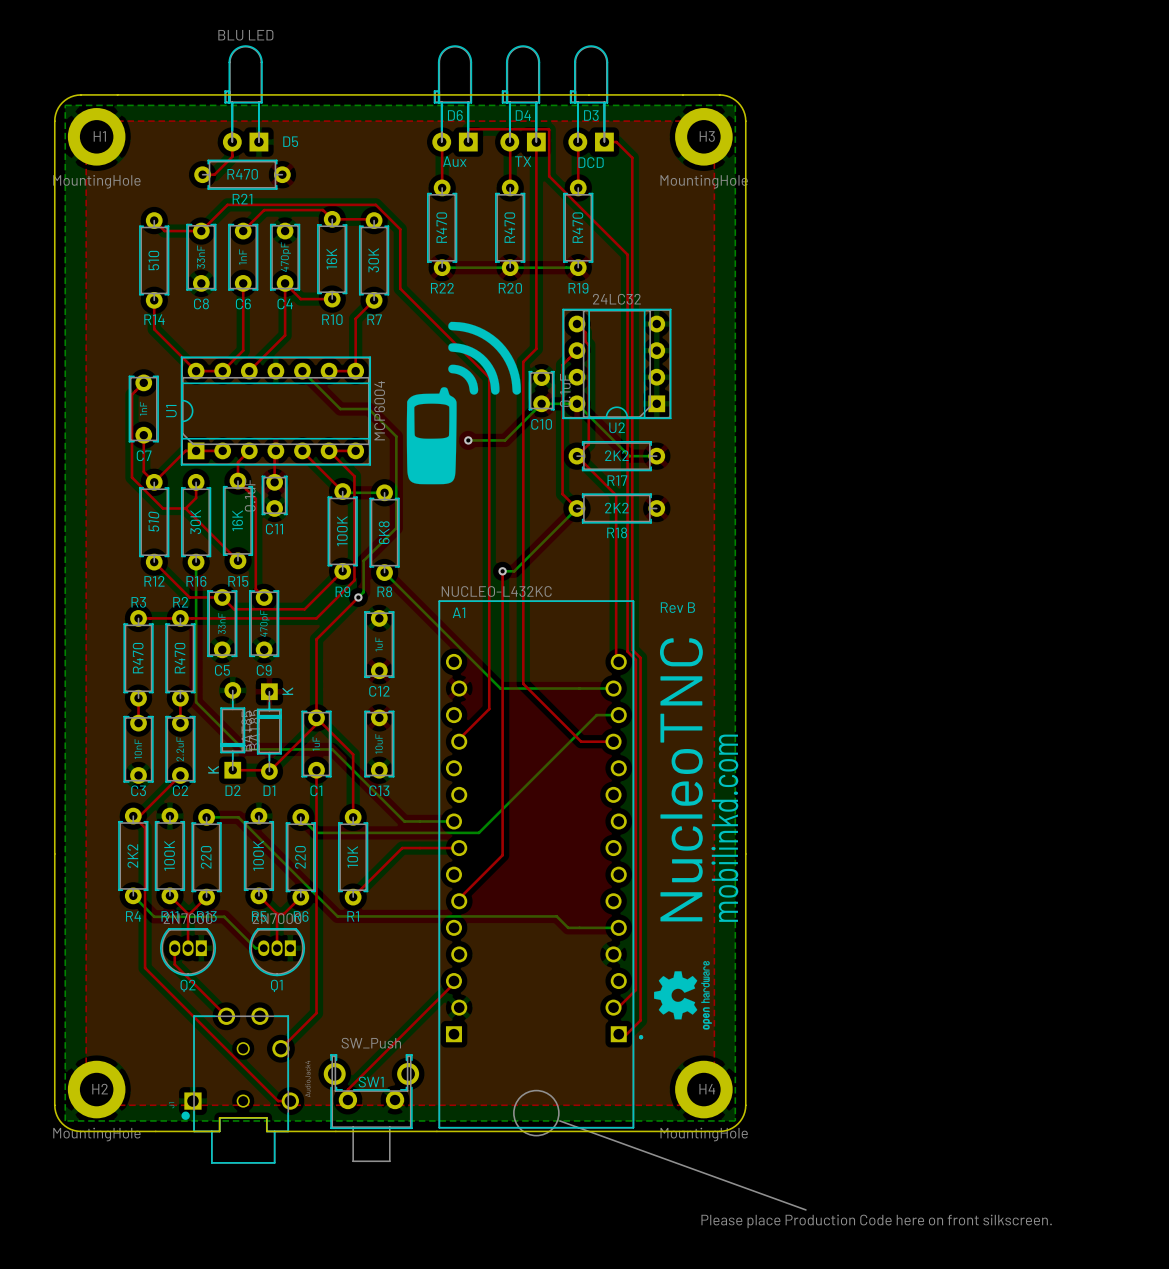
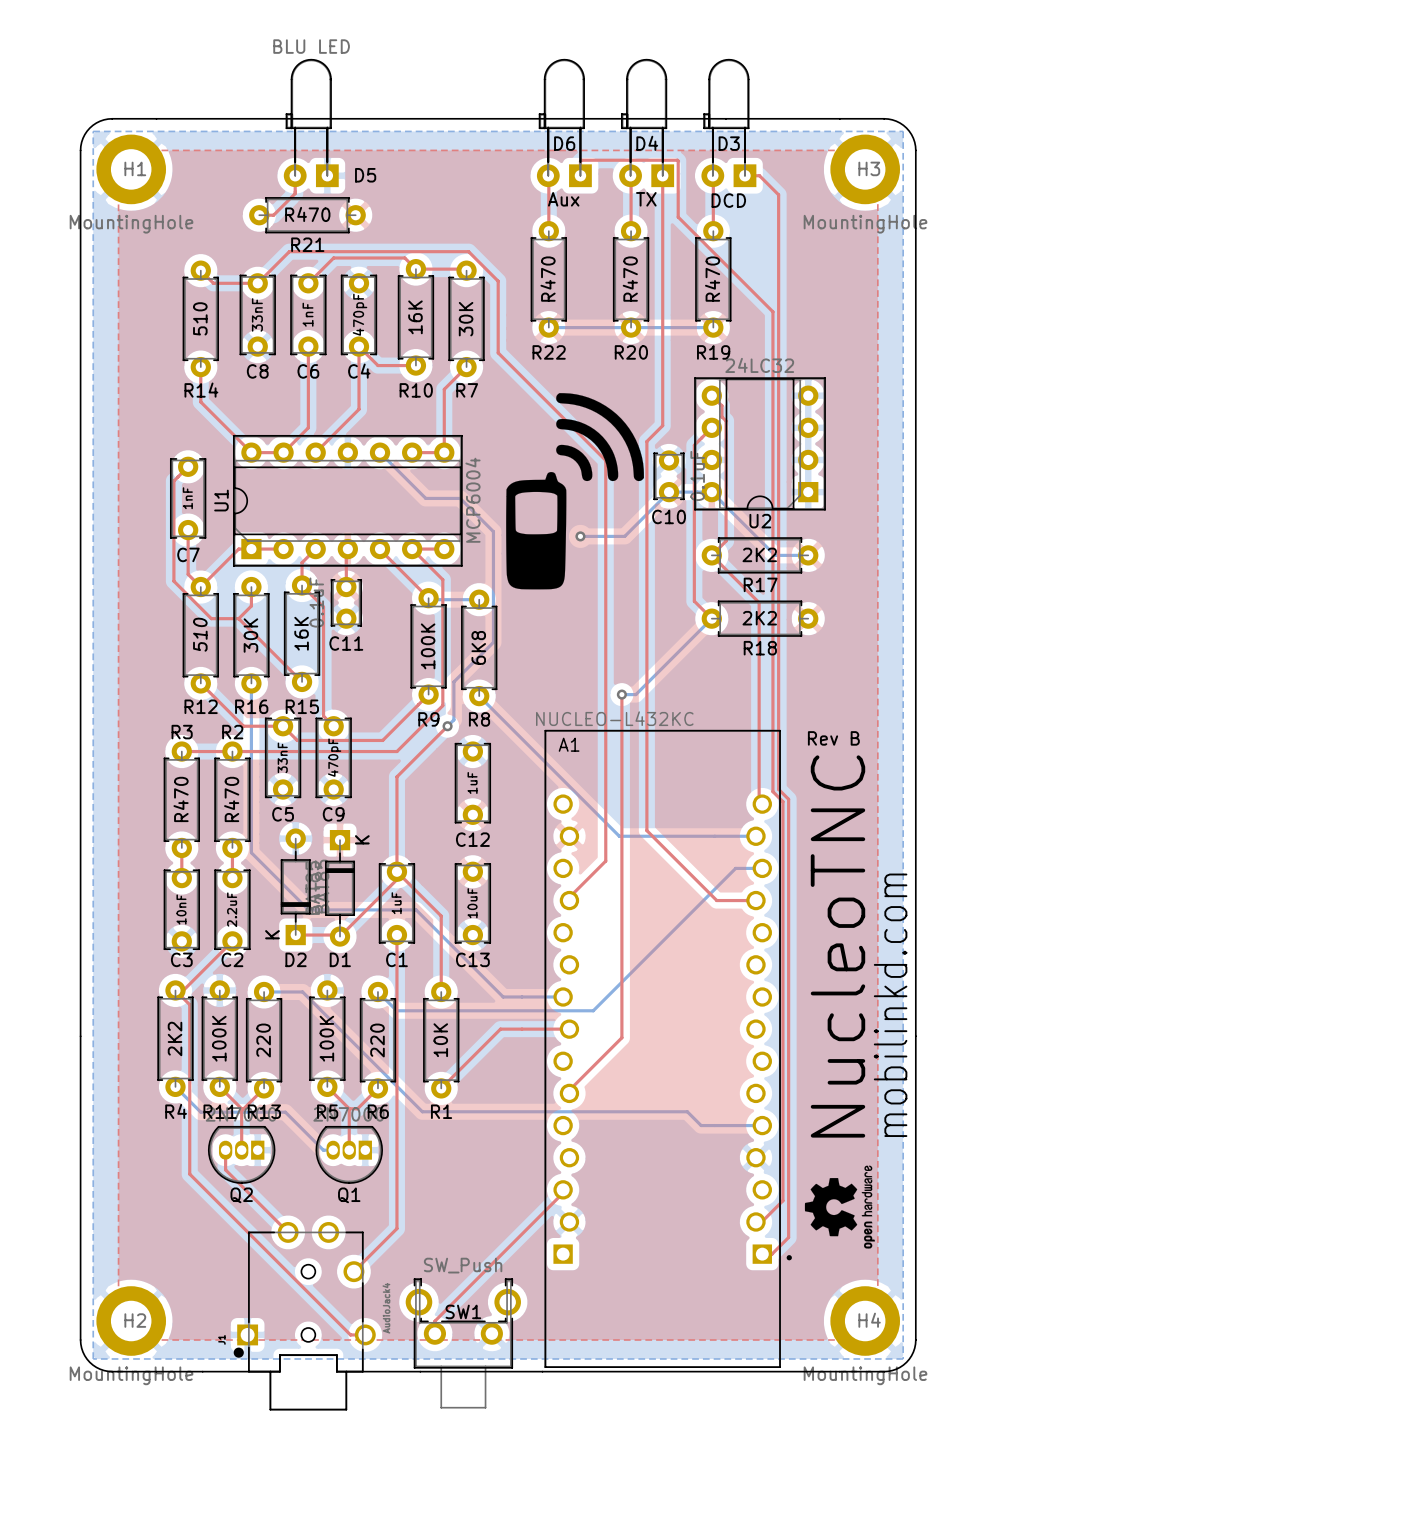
drawing: [513, 1089, 560, 1137] -> none
line: (559, 1120) (805, 1209) -> none
text: Please place Production Code here on front silkscreen. (876, 1221) -> none

